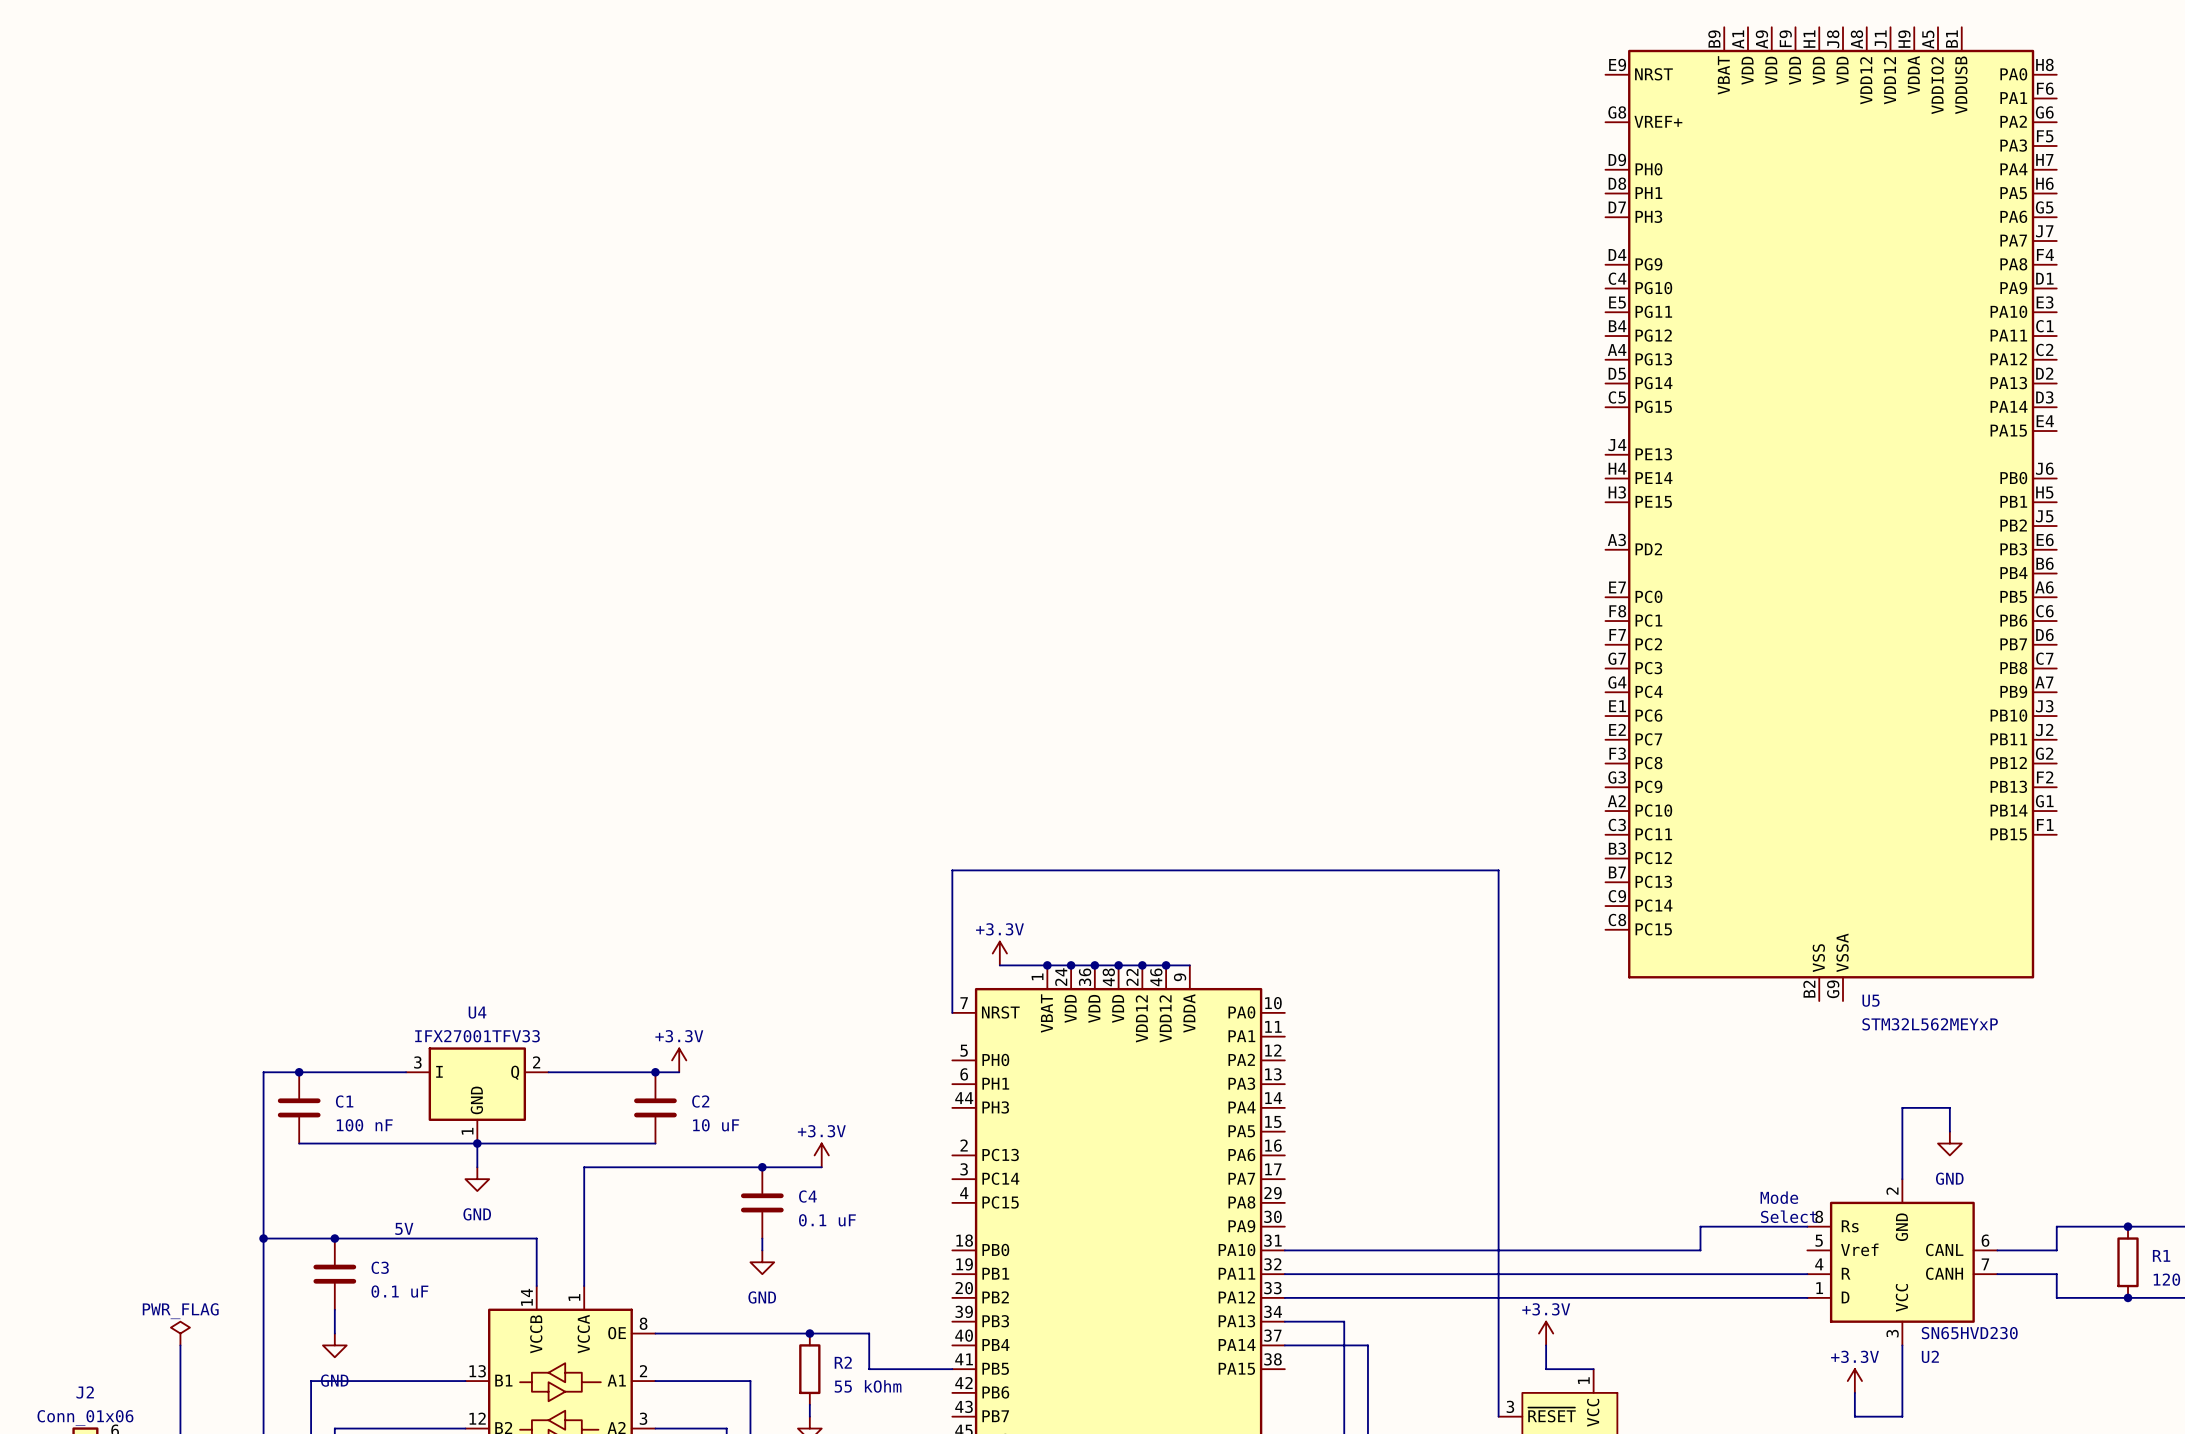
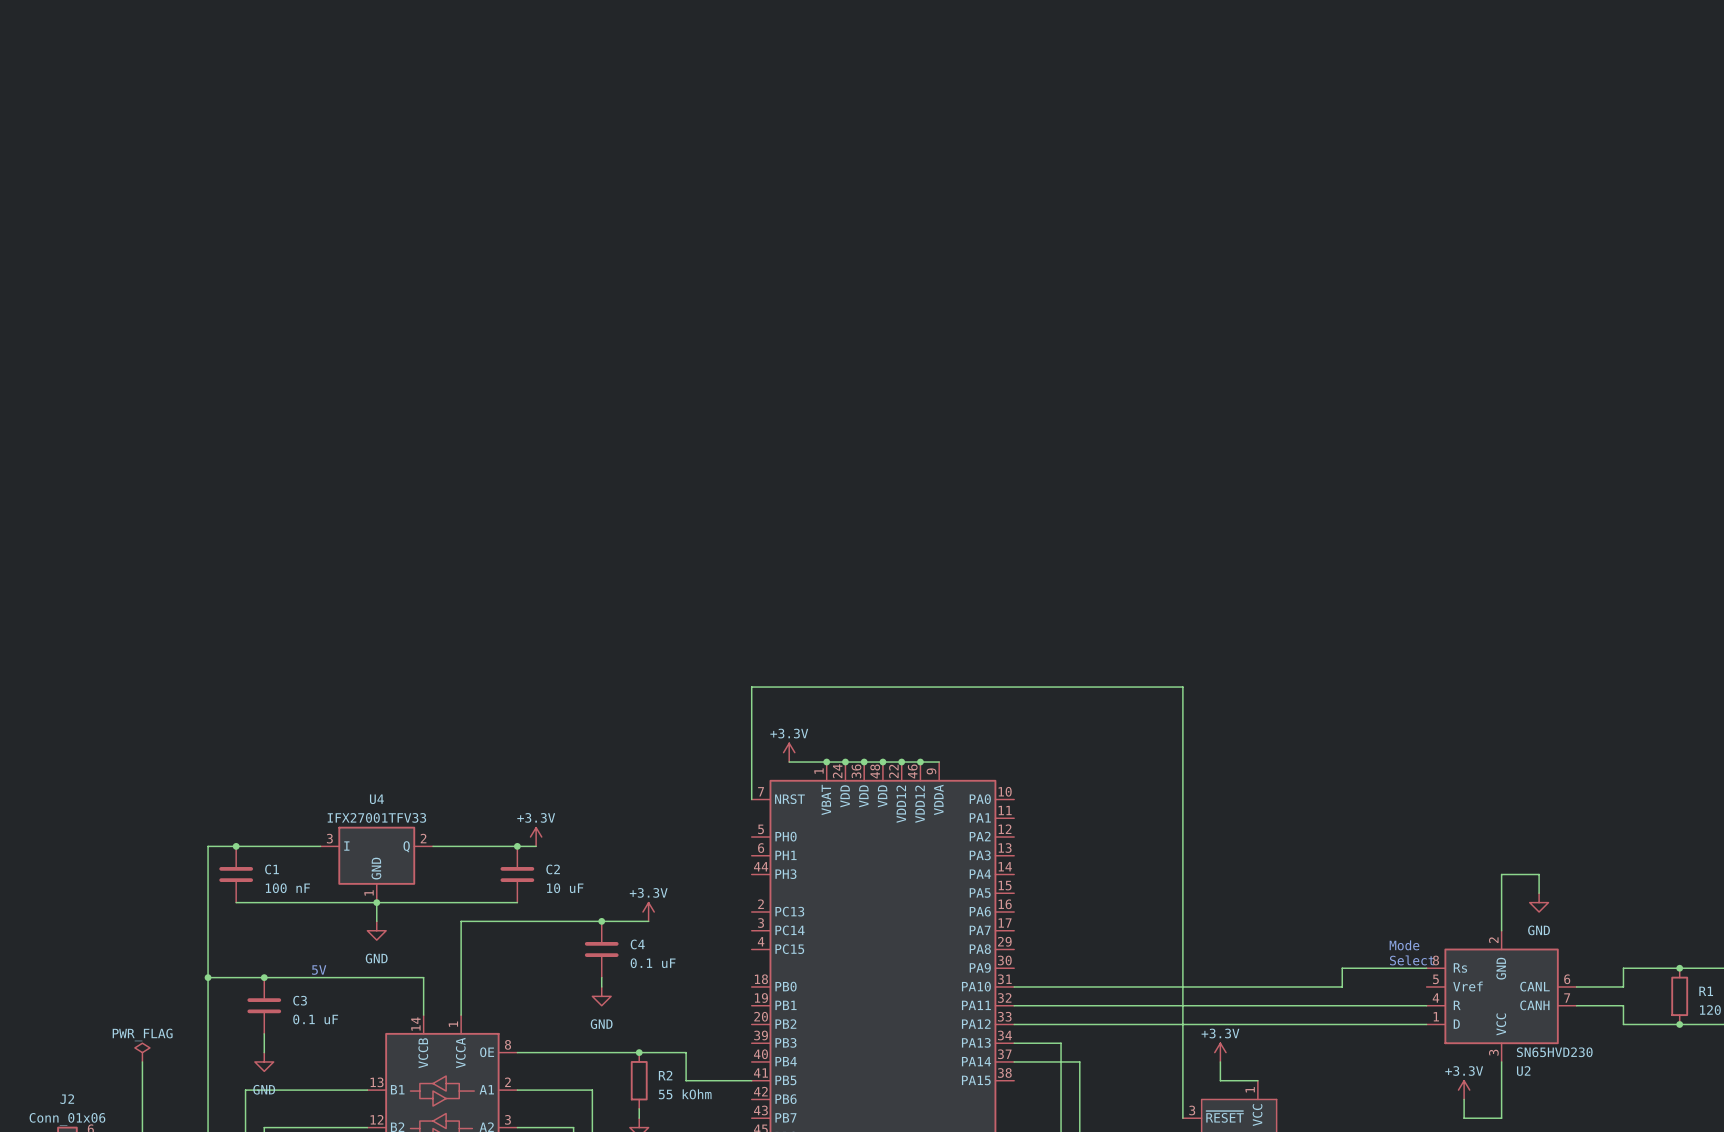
U5: STM32L562MEYxP (1831, 514) -> none

